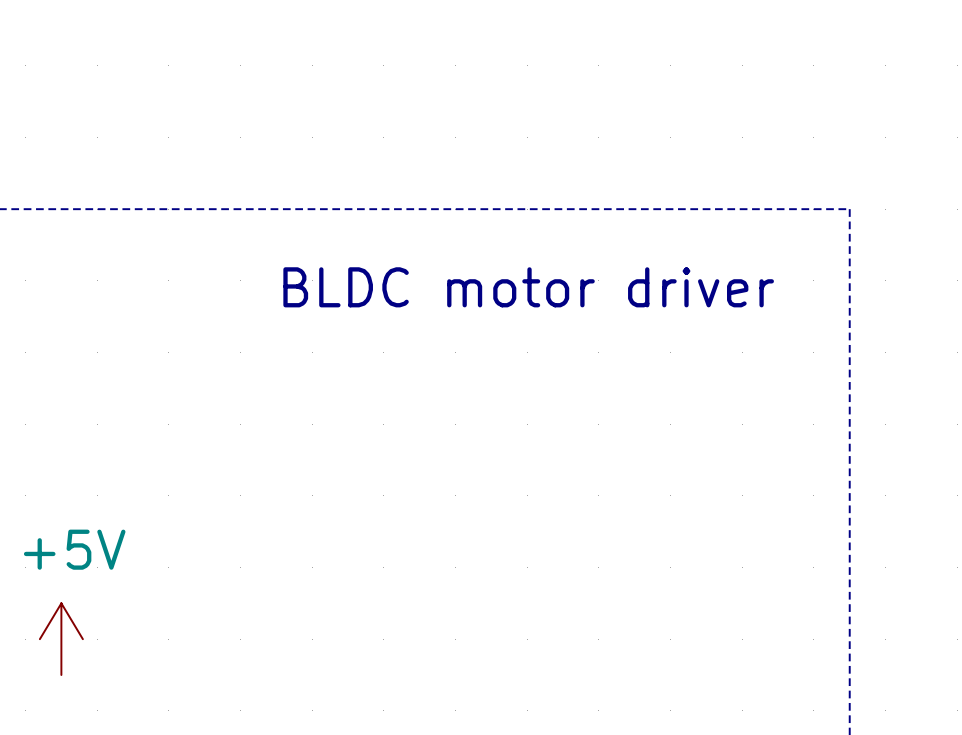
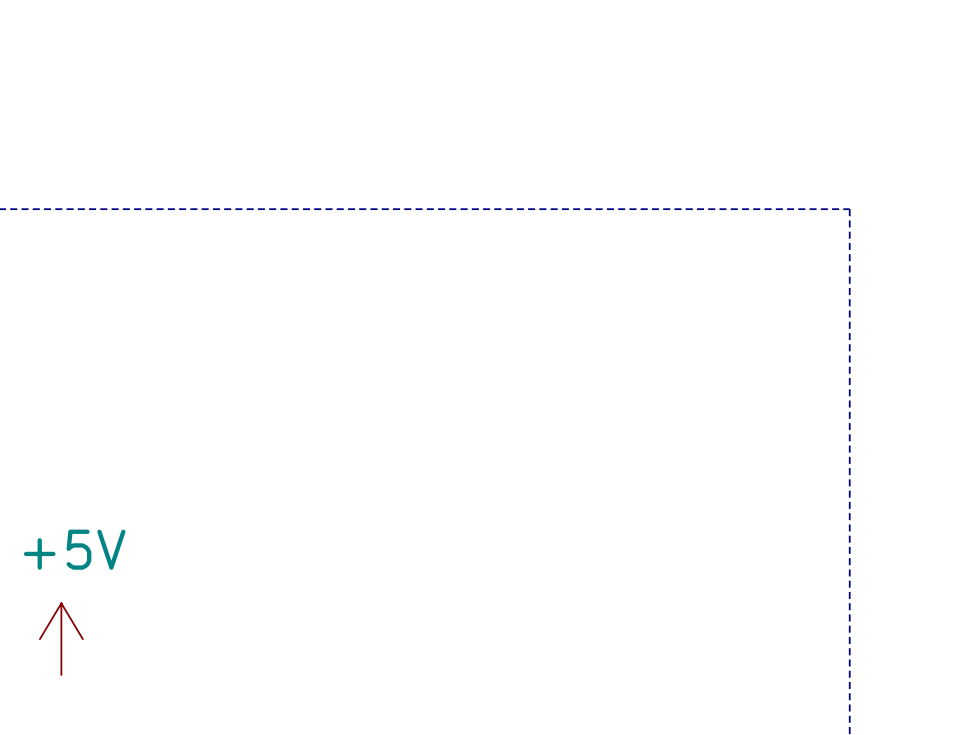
text: BLDC motor driver (528, 287) -> none

